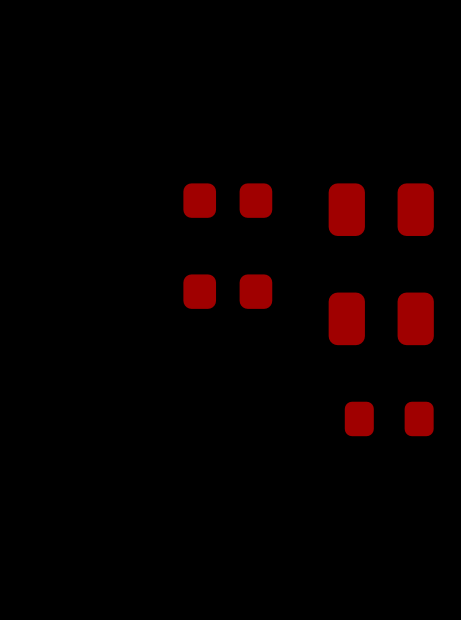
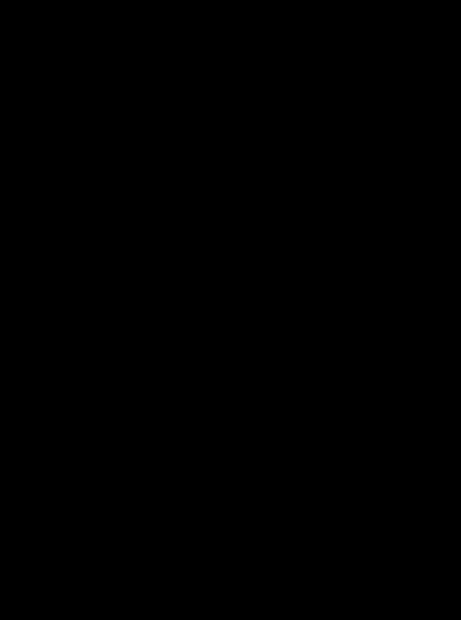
part: (227, 200) -> none
part: (381, 209) -> none
part: (227, 291) -> none
part: (381, 318) -> none
part: (389, 418) -> none

